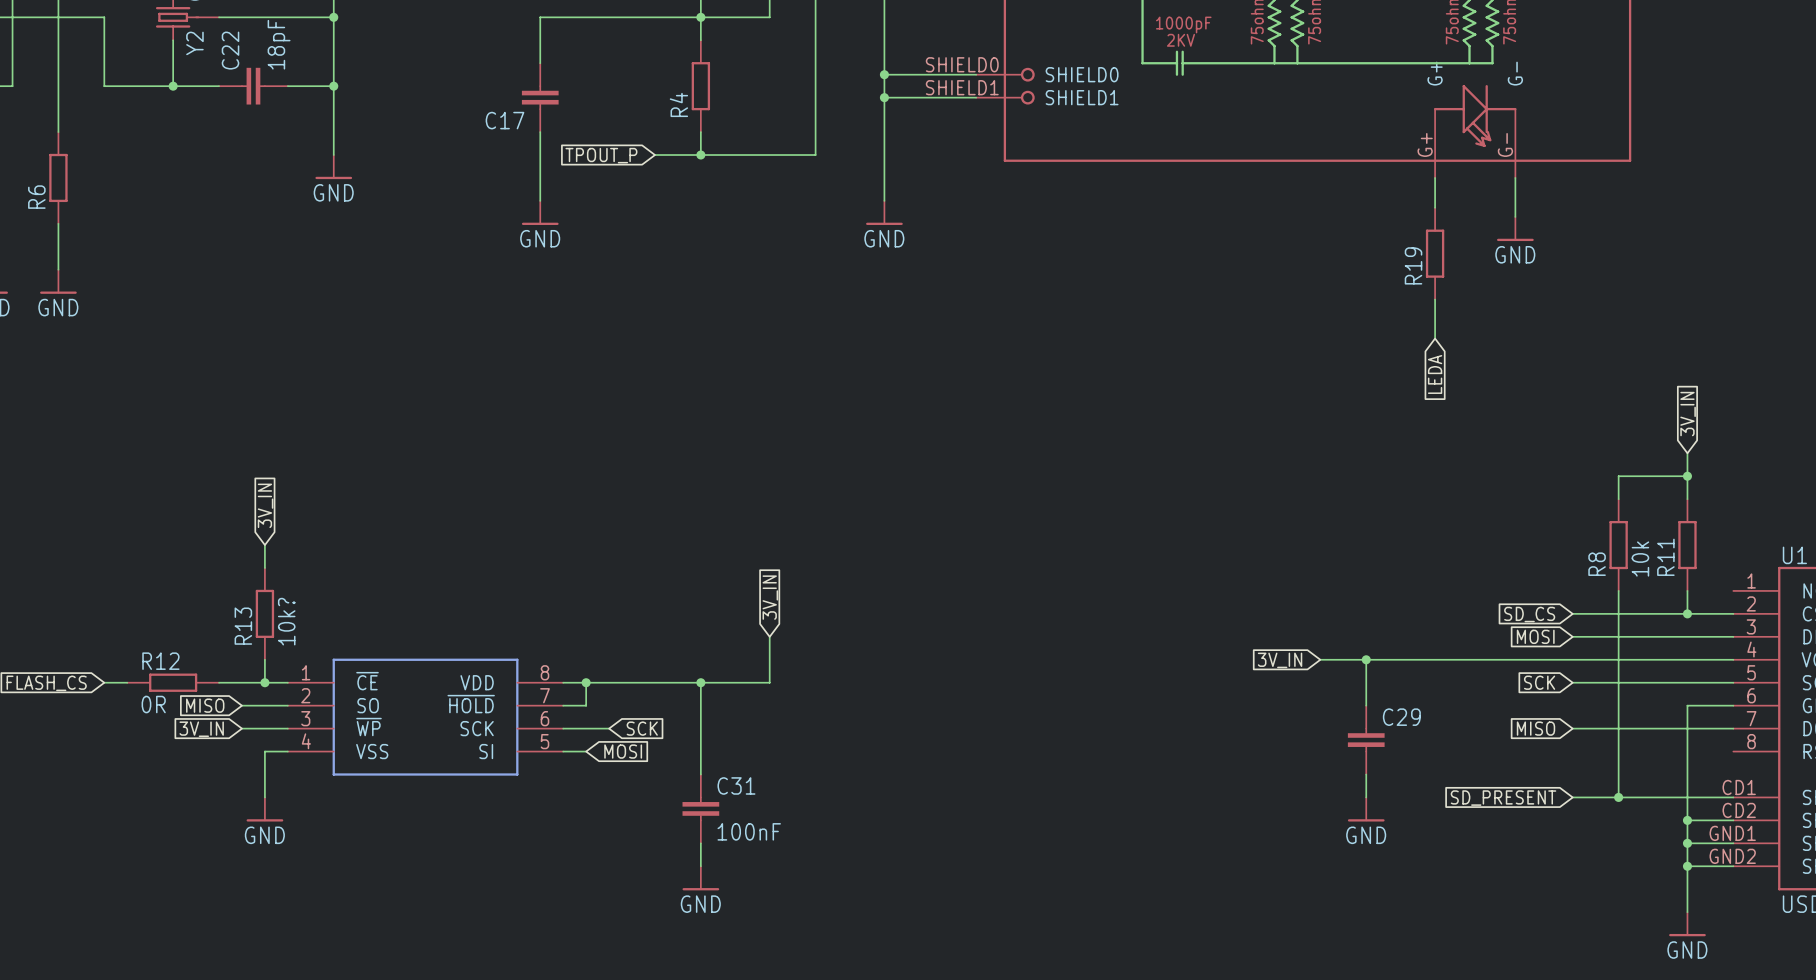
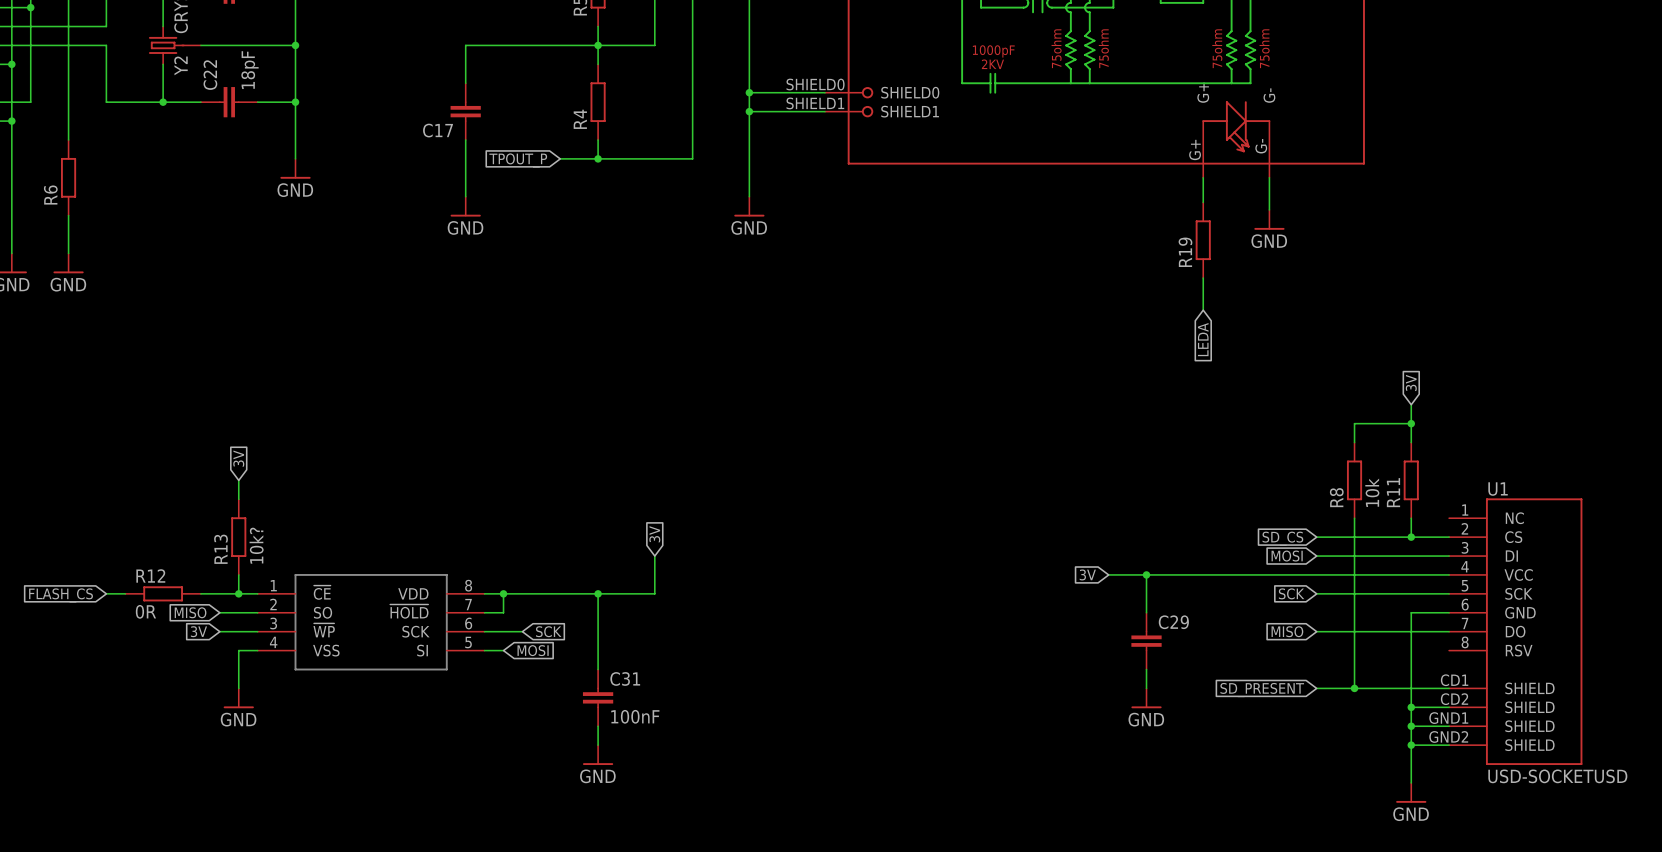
global label: 3V_IN (1688, 414) -> 3V (1411, 382)
global label: 3V_IN (265, 505) -> 3V (238, 458)
global label: 3V_IN (770, 597) -> 3V (654, 534)
global label: 3V_IN (1280, 660) -> 3V (1087, 574)
global label: 3V_IN (201, 729) -> 3V (198, 631)

